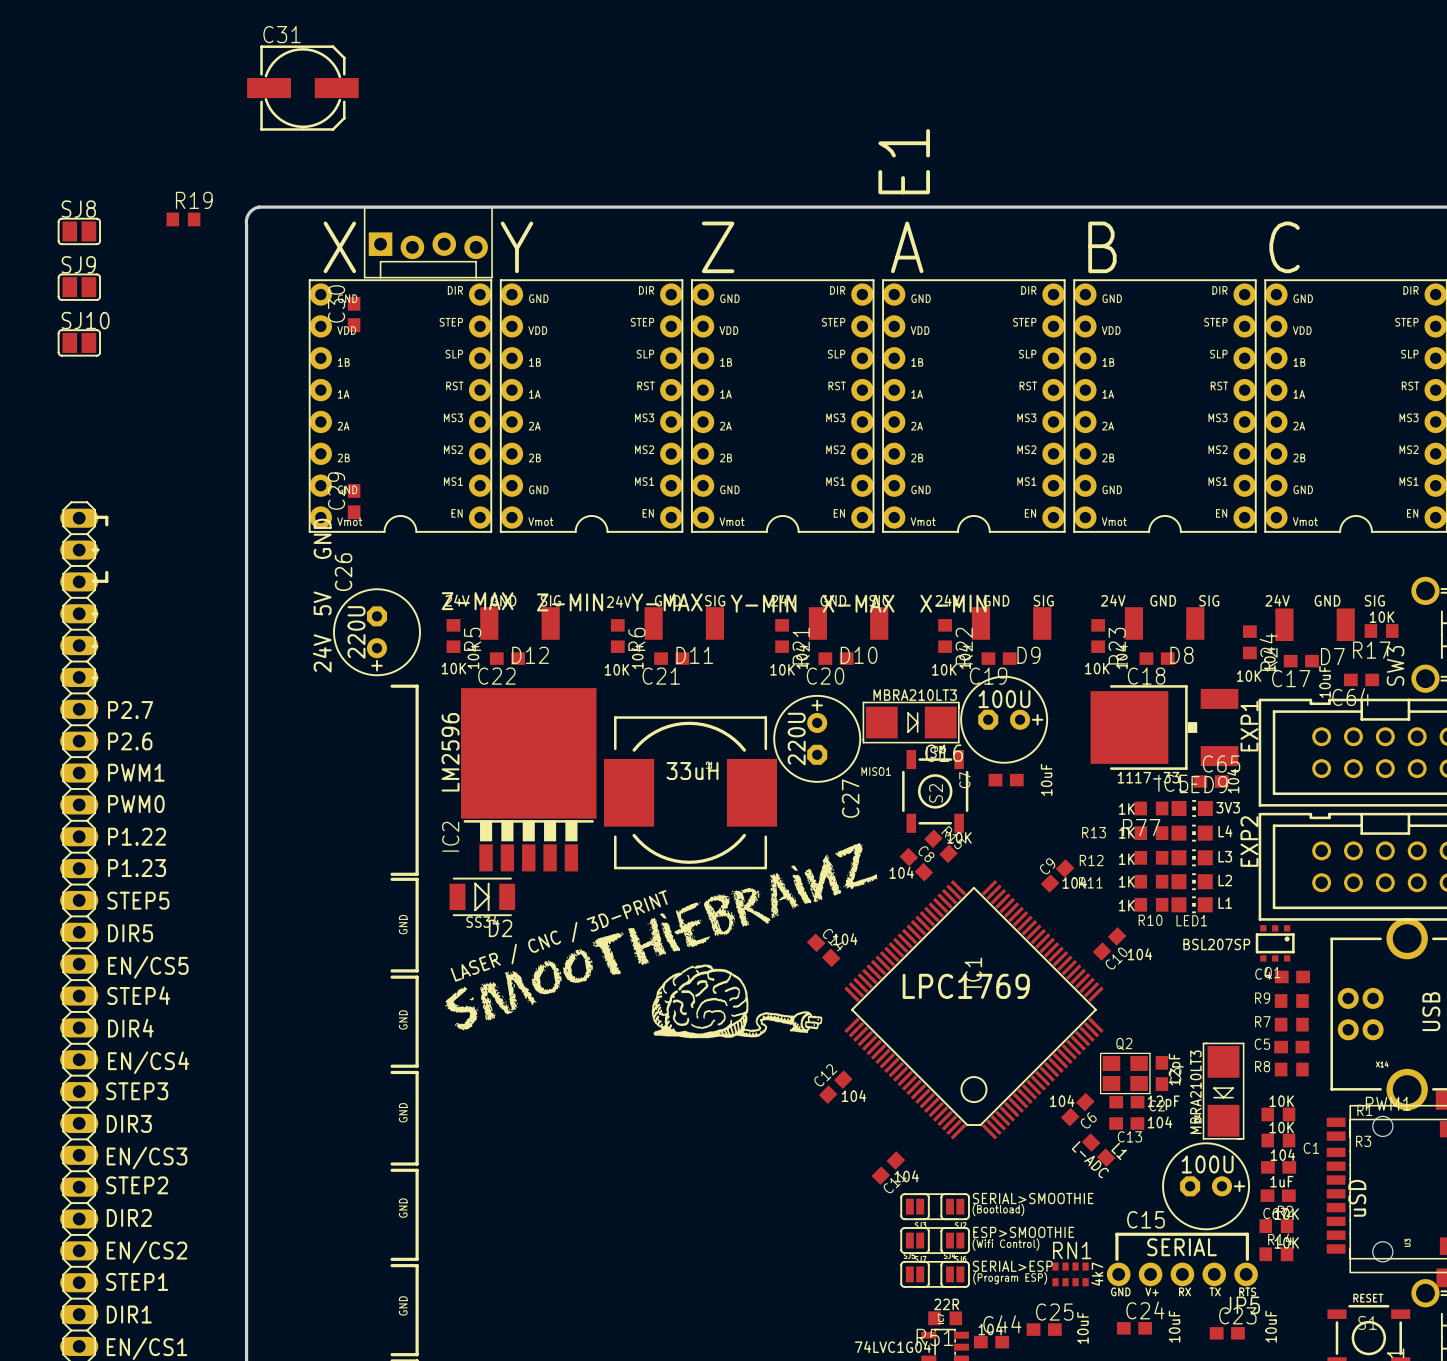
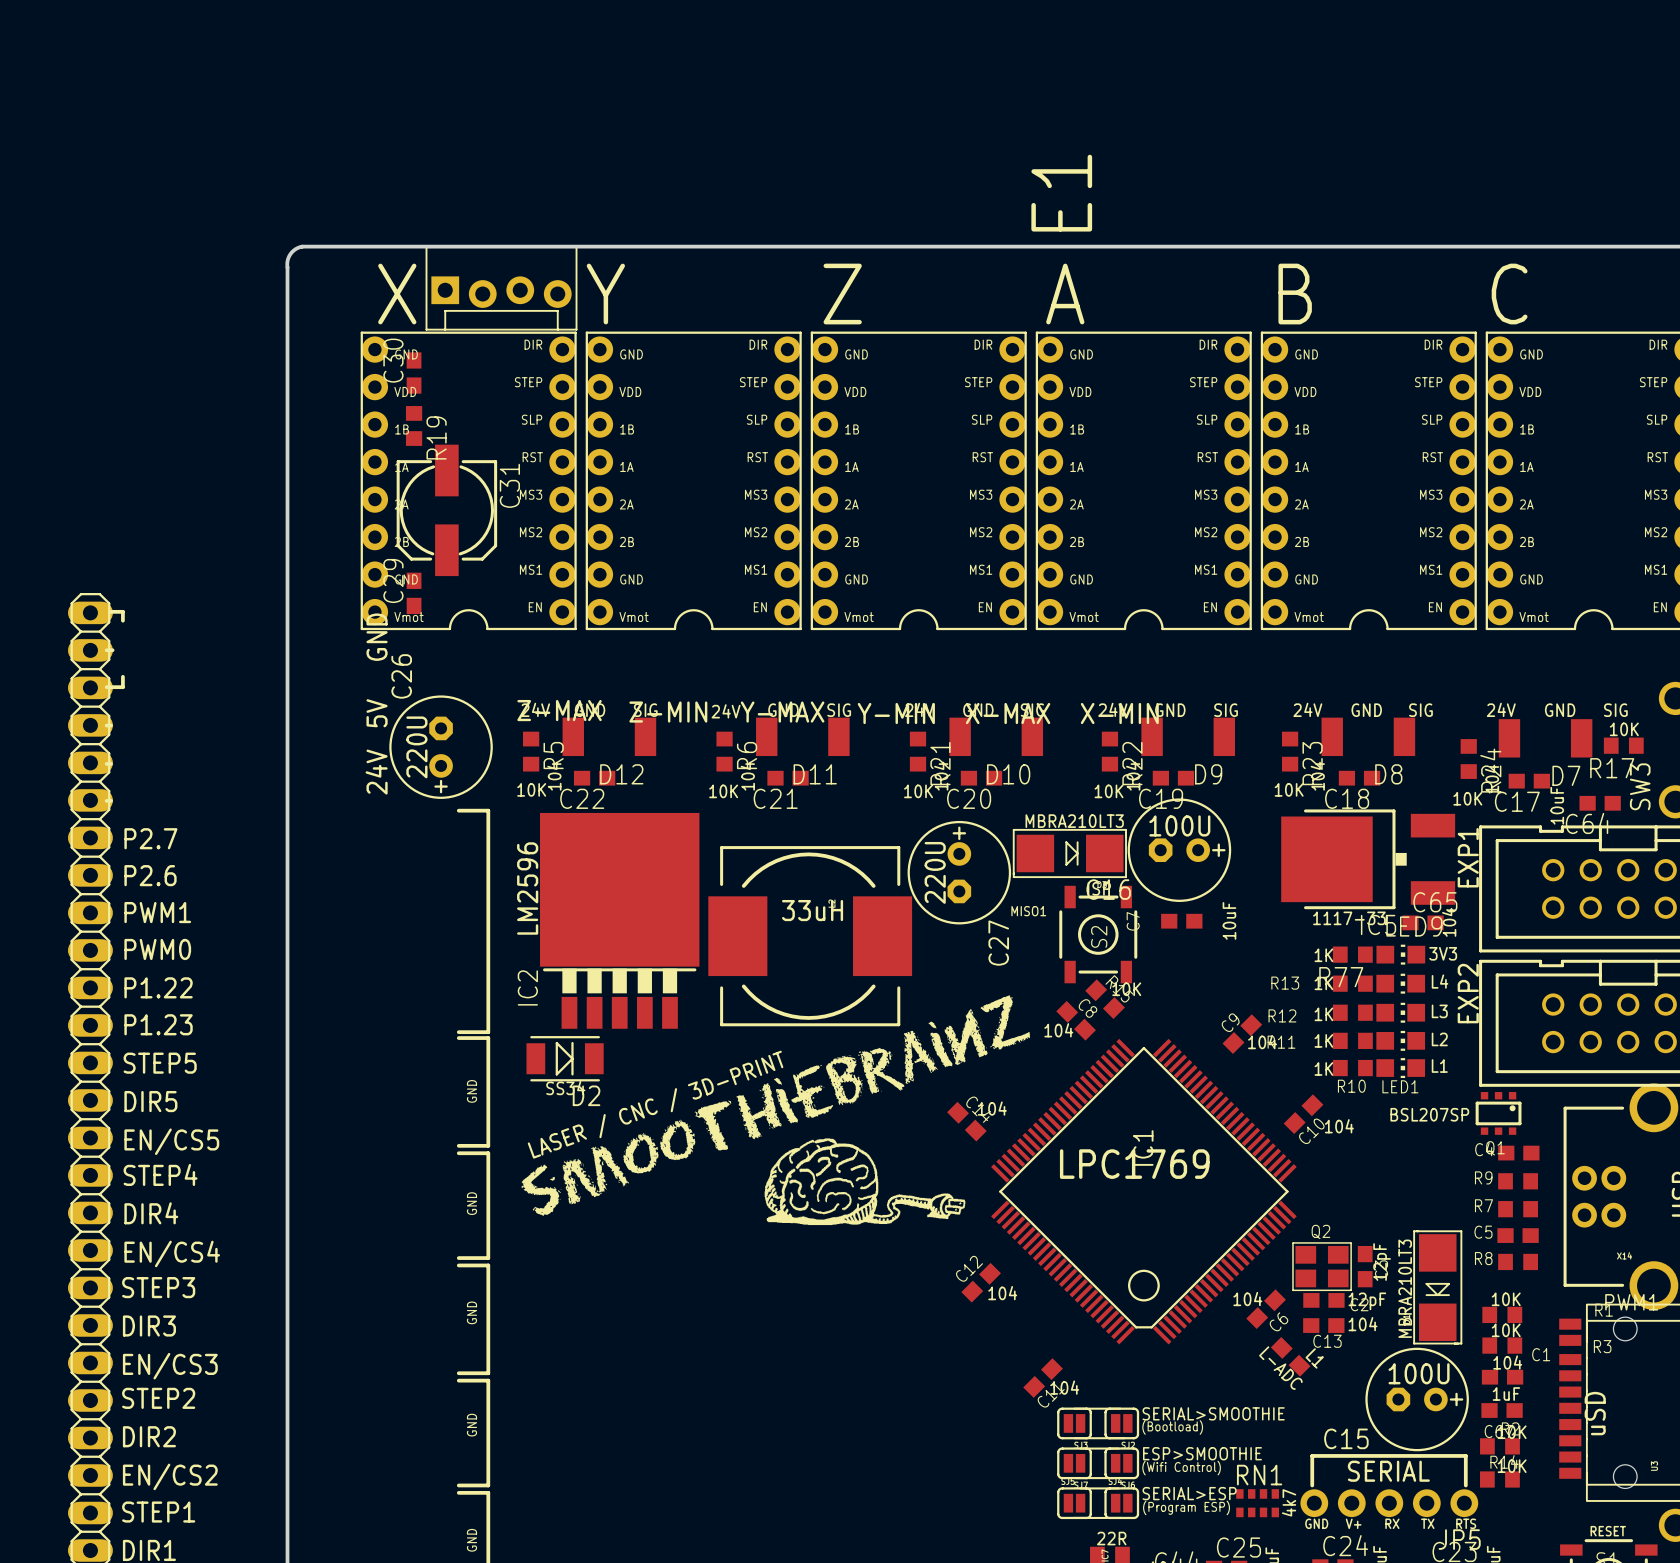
C31 rotation: 0° (302, 88) -> 90° clockwise (446, 510)
C31 position: (302, 88) -> (446, 510)
R19 rotation: 0° (183, 219) -> 90° clockwise (414, 425)
R19 position: (183, 219) -> (414, 425)
SJ8: (79, 231) -> none
SJ9: (79, 287) -> none
SJ10: (79, 342) -> none

